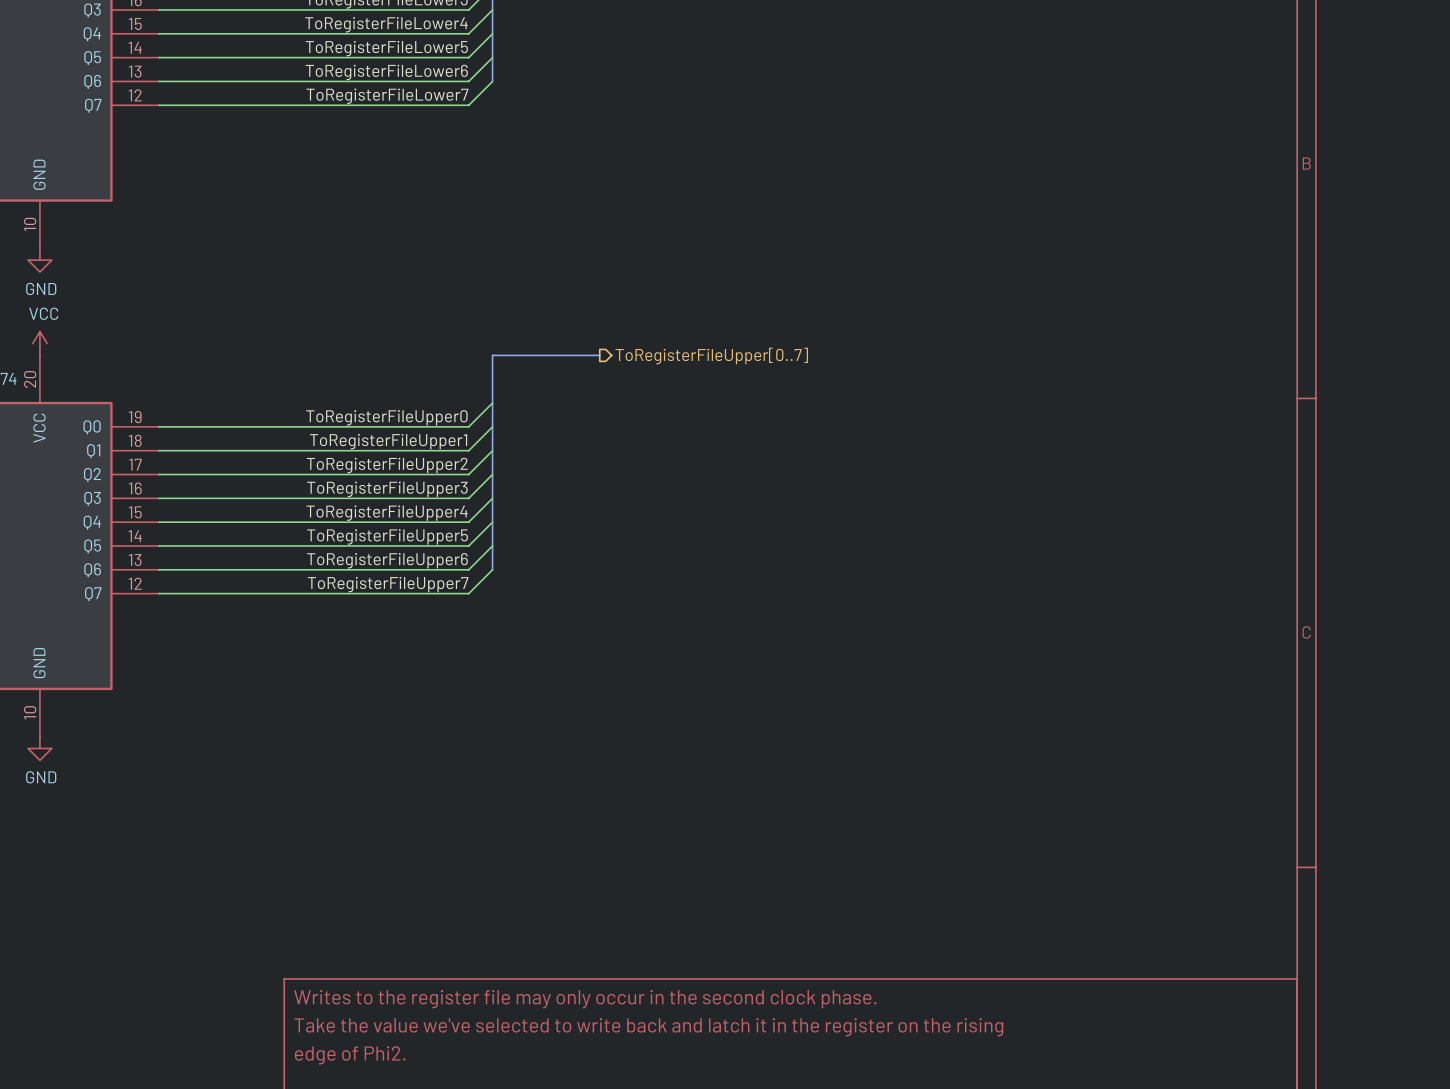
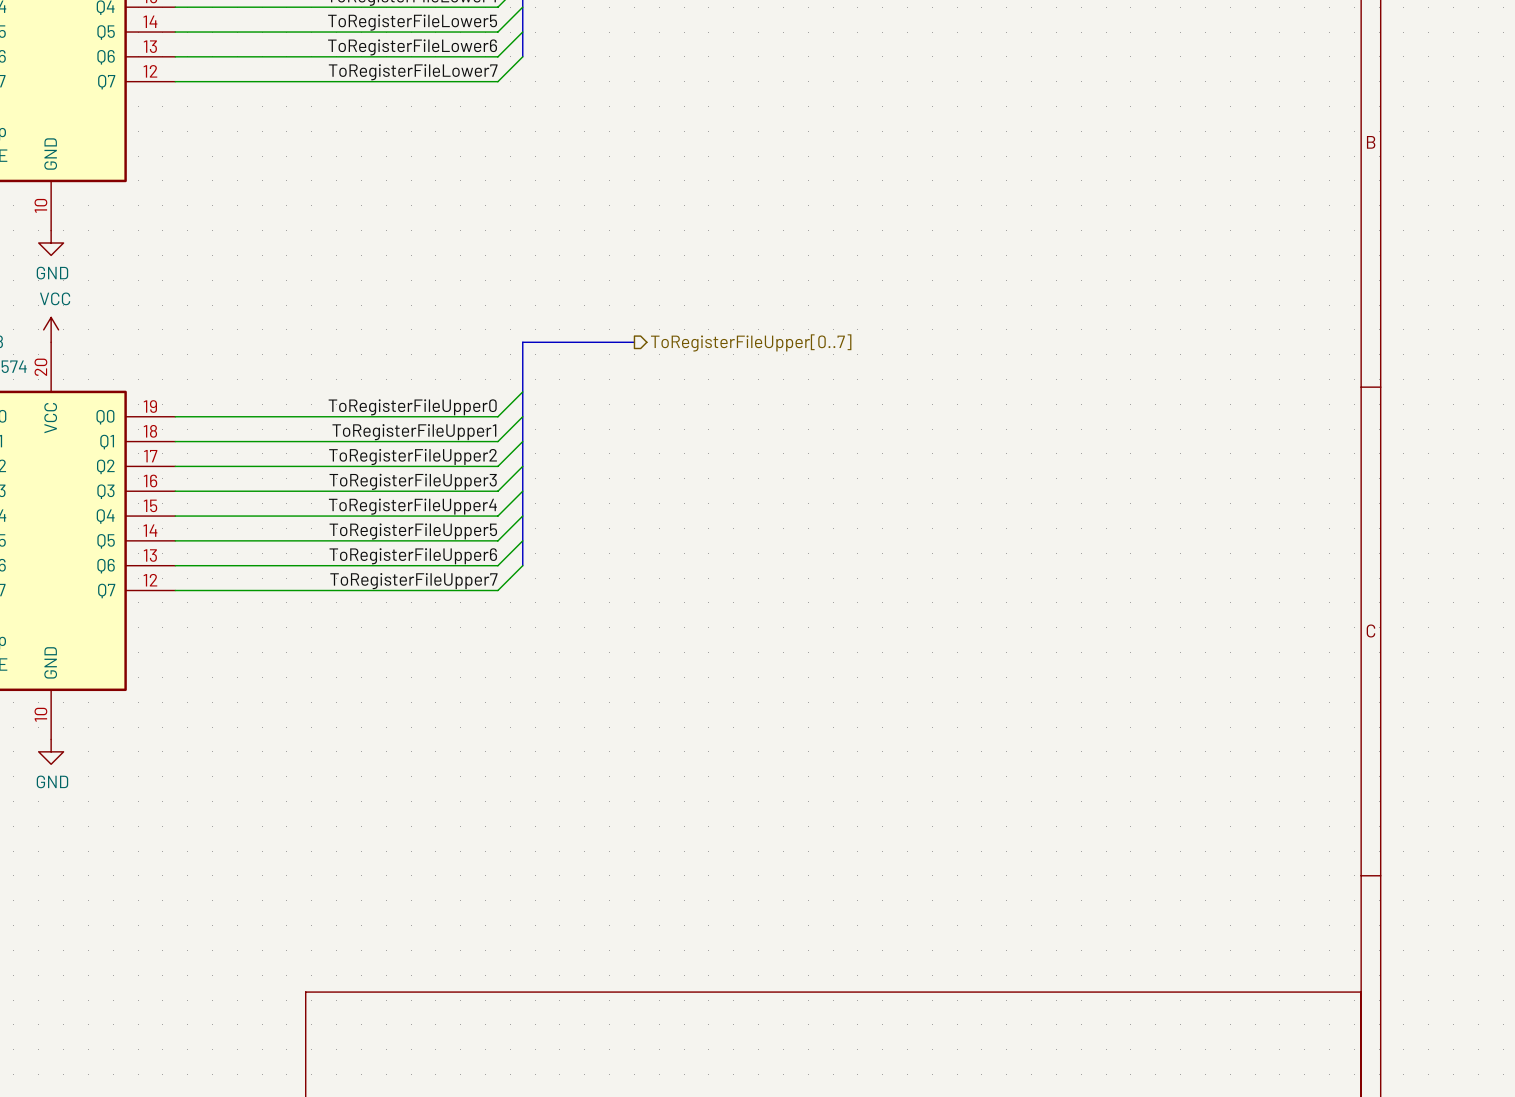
title block: Writes to the register file may only occur in the second clock phase. (585, 999) -> none
title block: Take the value we've selected to write back and latch it in the register on the rising (648, 1027) -> none
title block: edge of Phi2. (350, 1055) -> none

